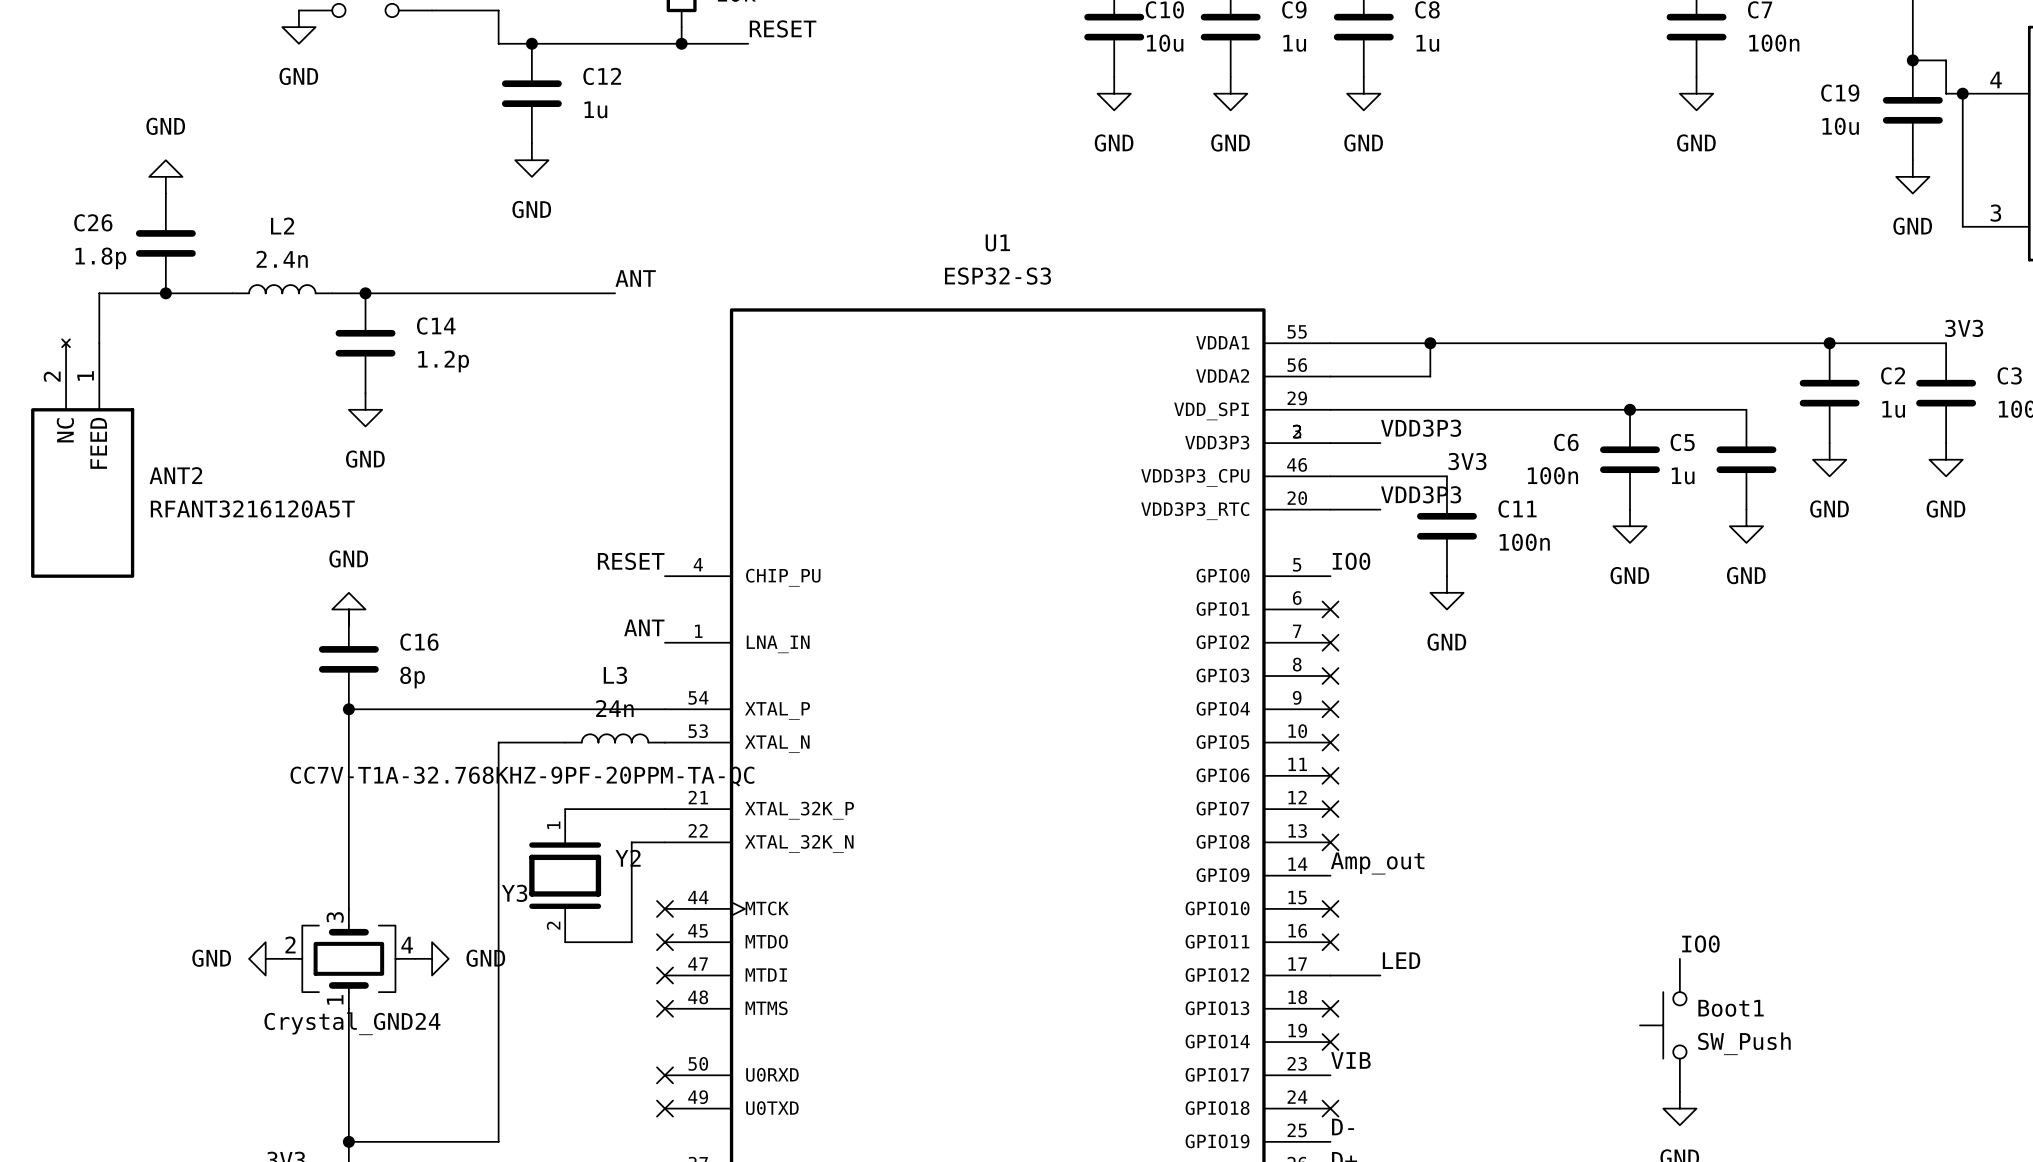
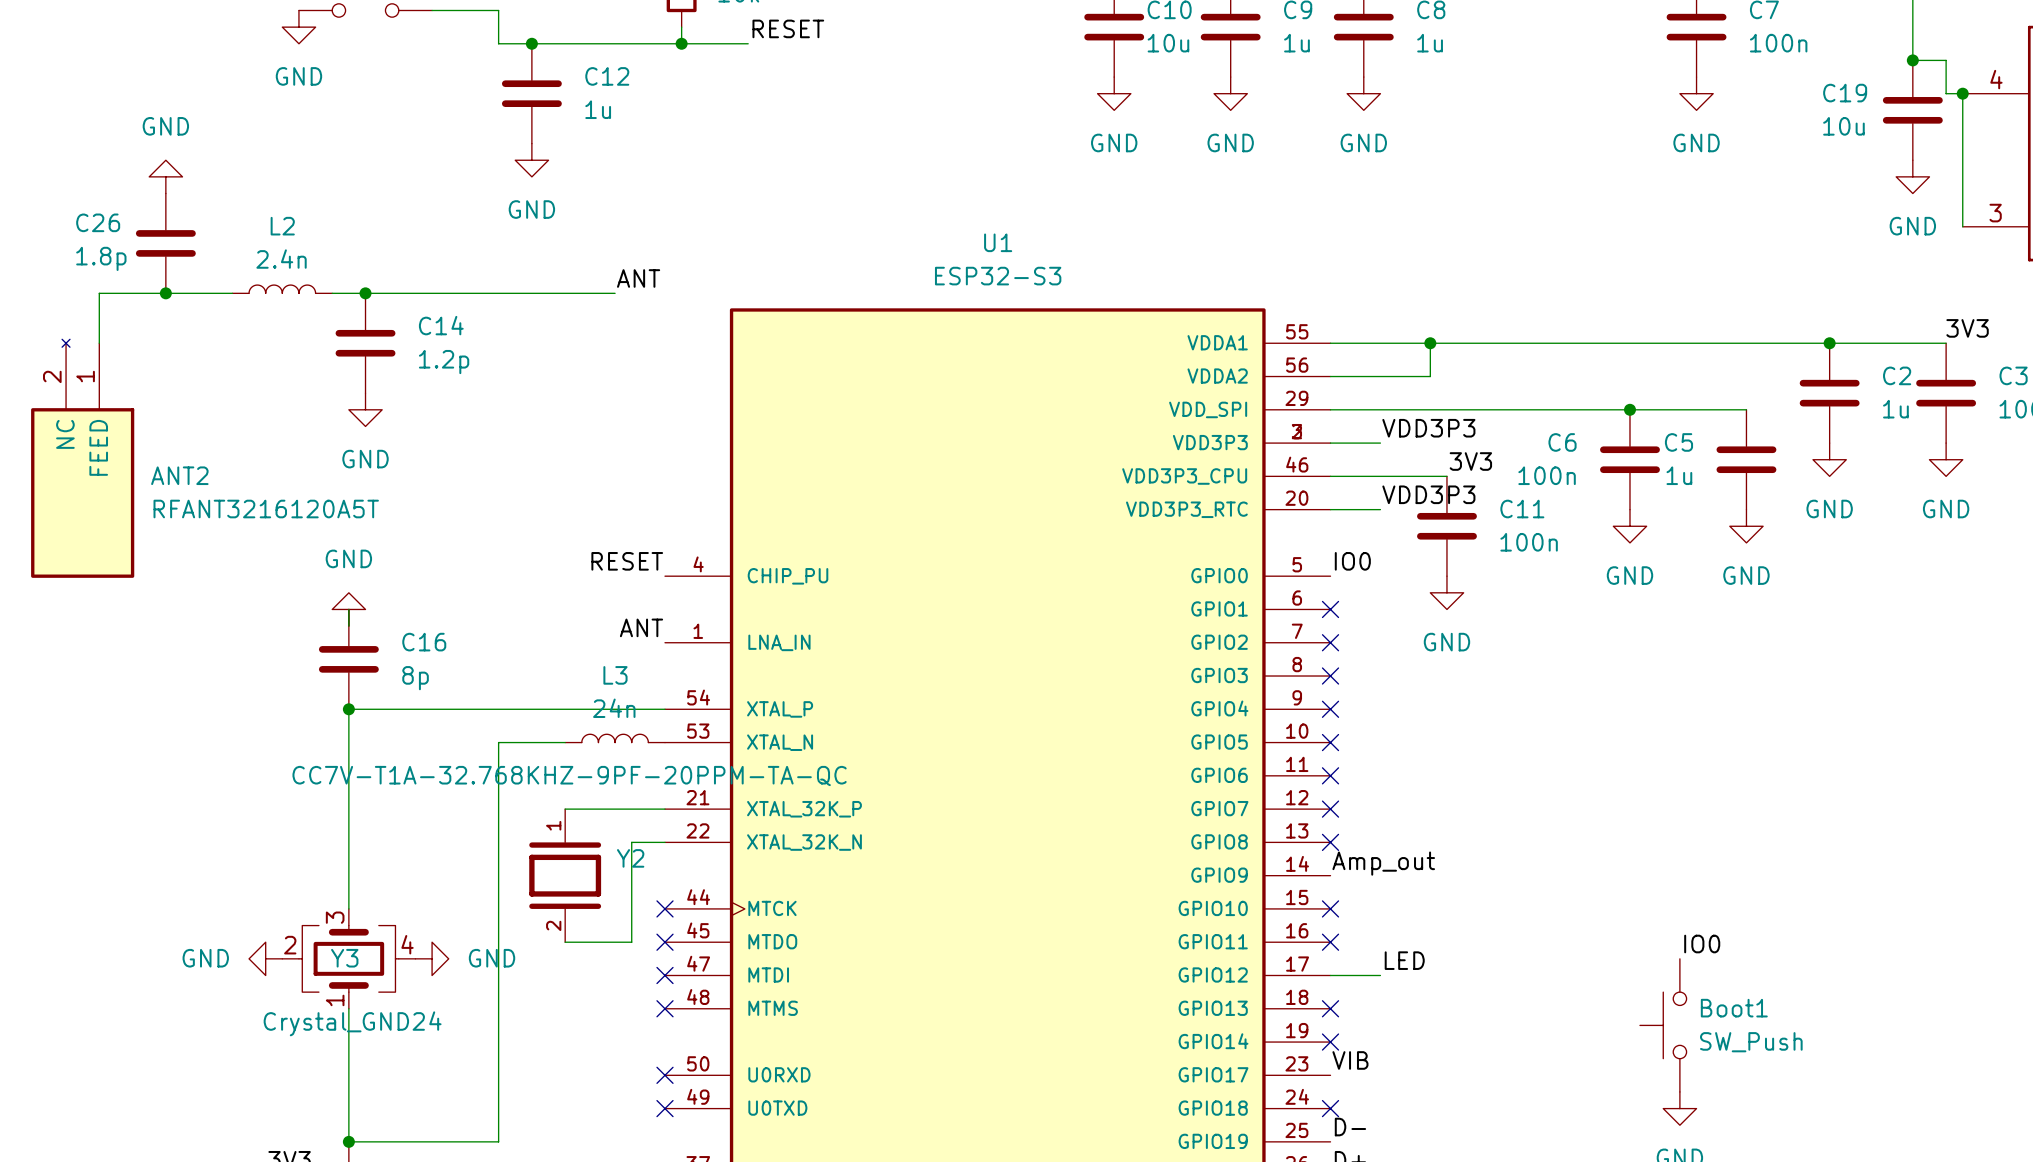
Y3 name position: Y3 (514, 893) -> Y3 (344, 958)

